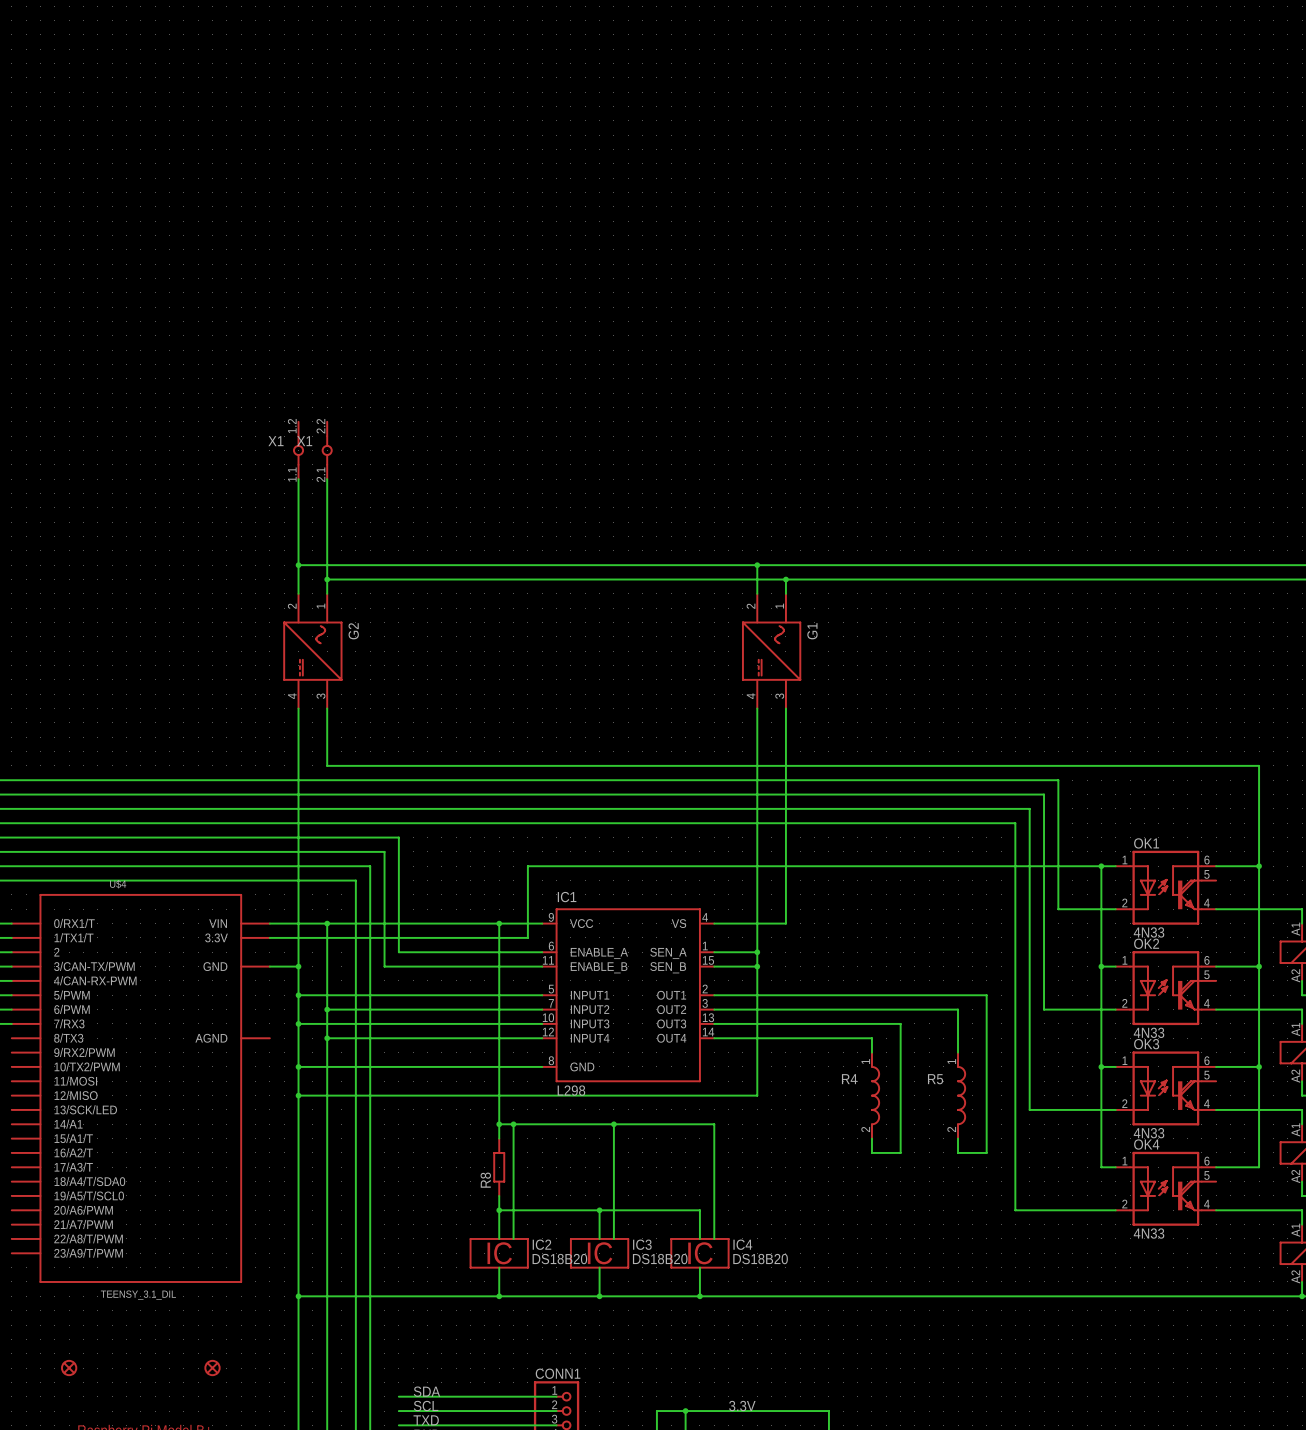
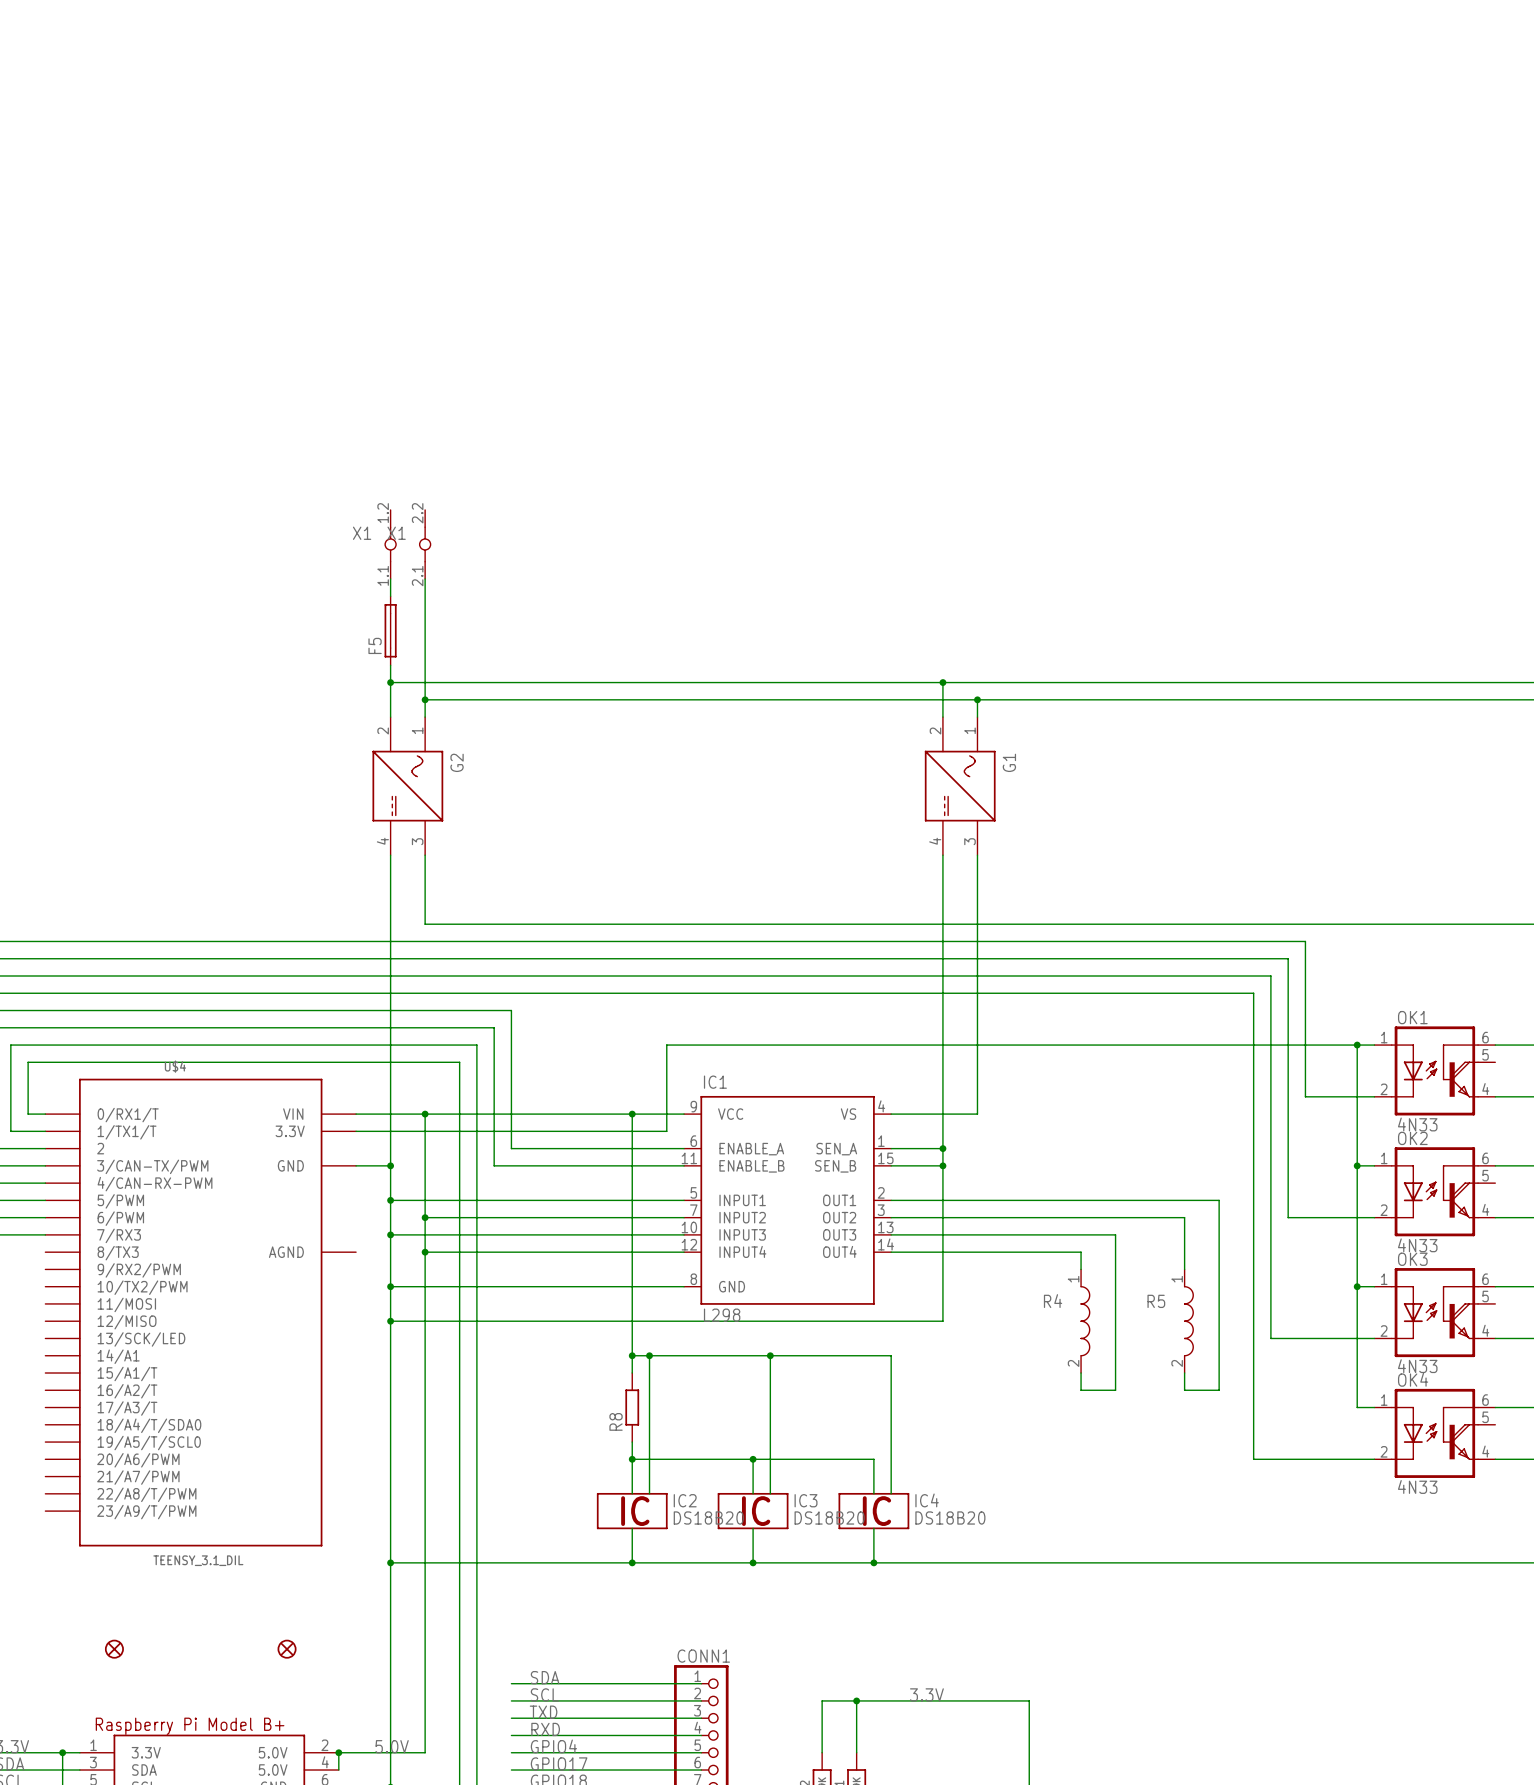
F5: none -> (390, 630)

